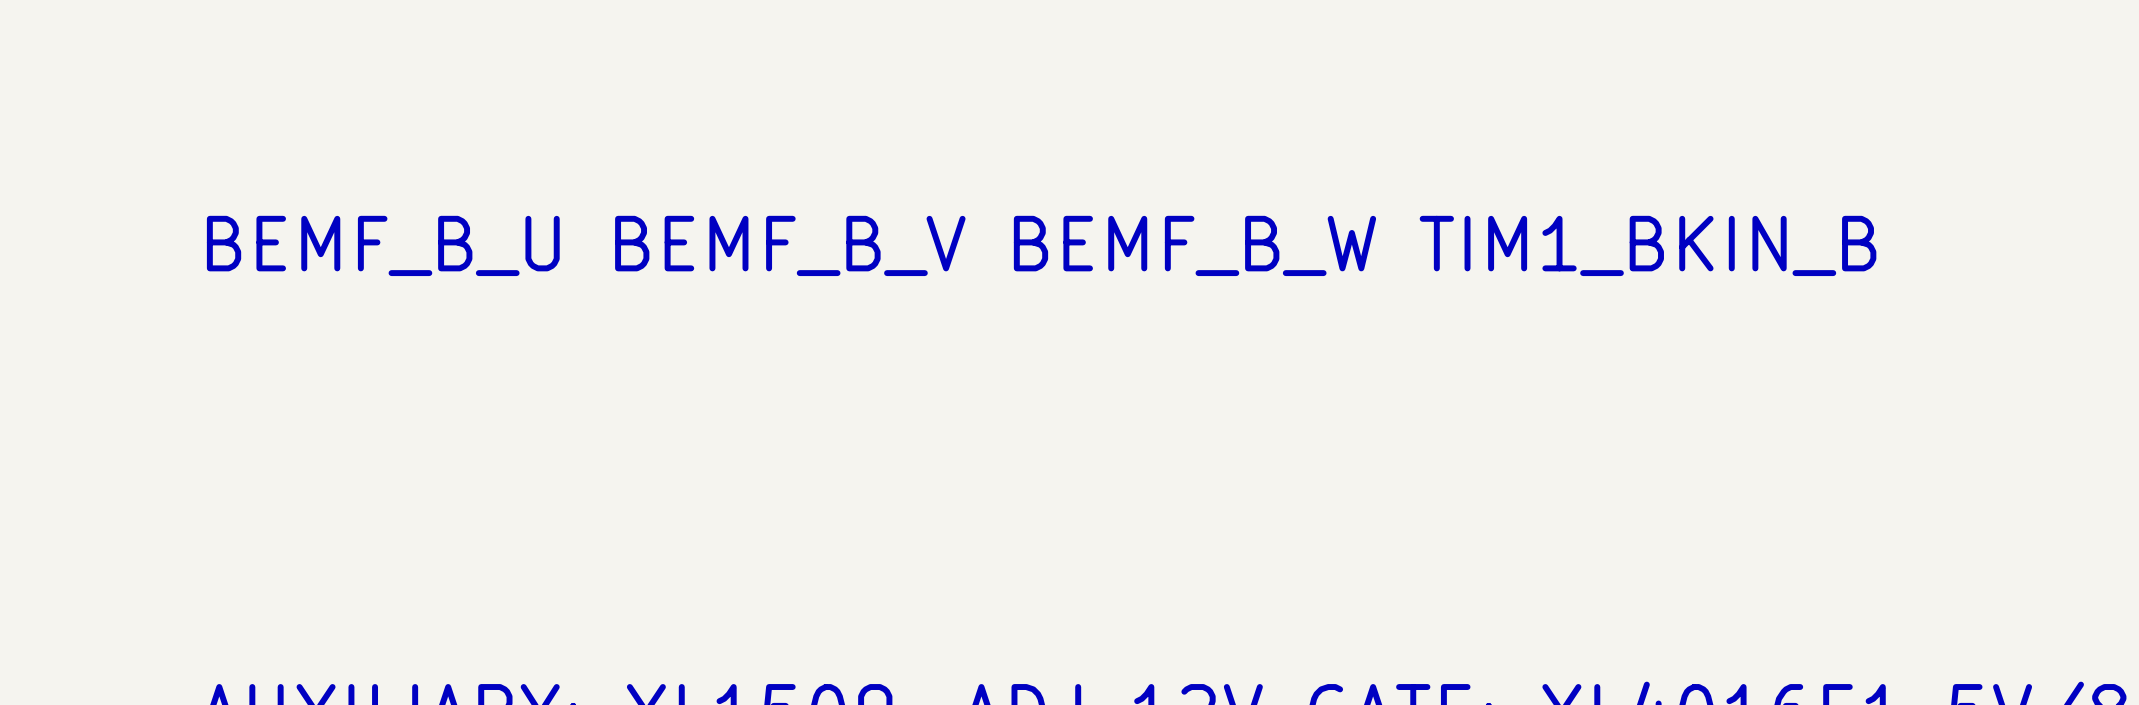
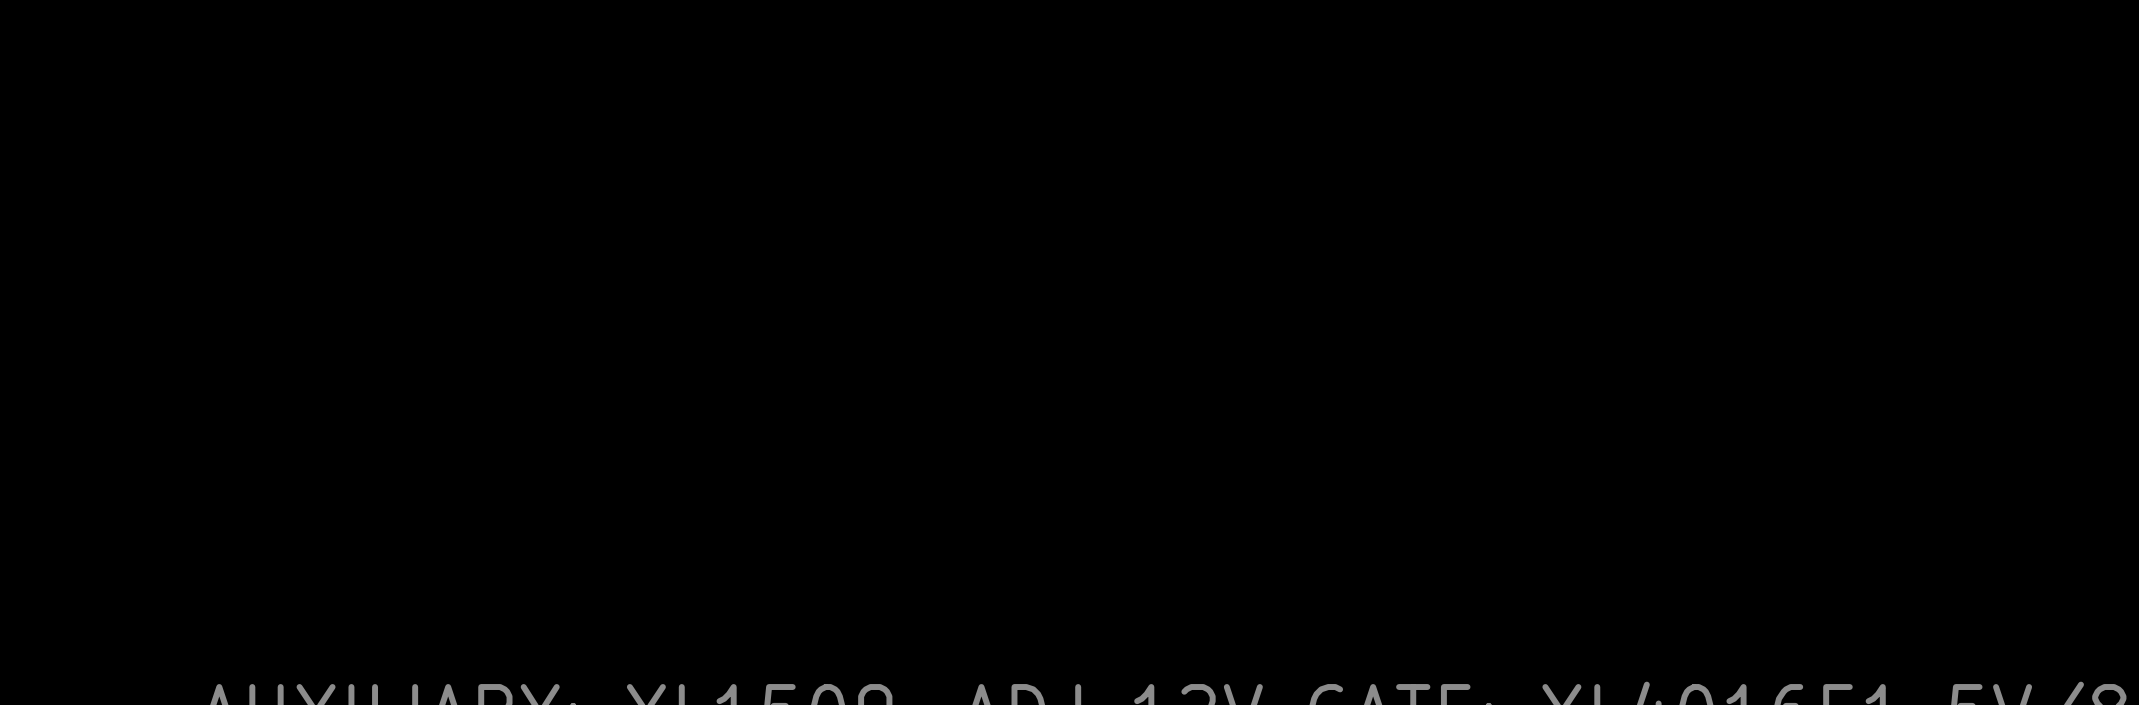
text: BEMF_B_U BEMF_B_V BEMF_B_W TIM1_BKIN_B (1041, 245) -> none

